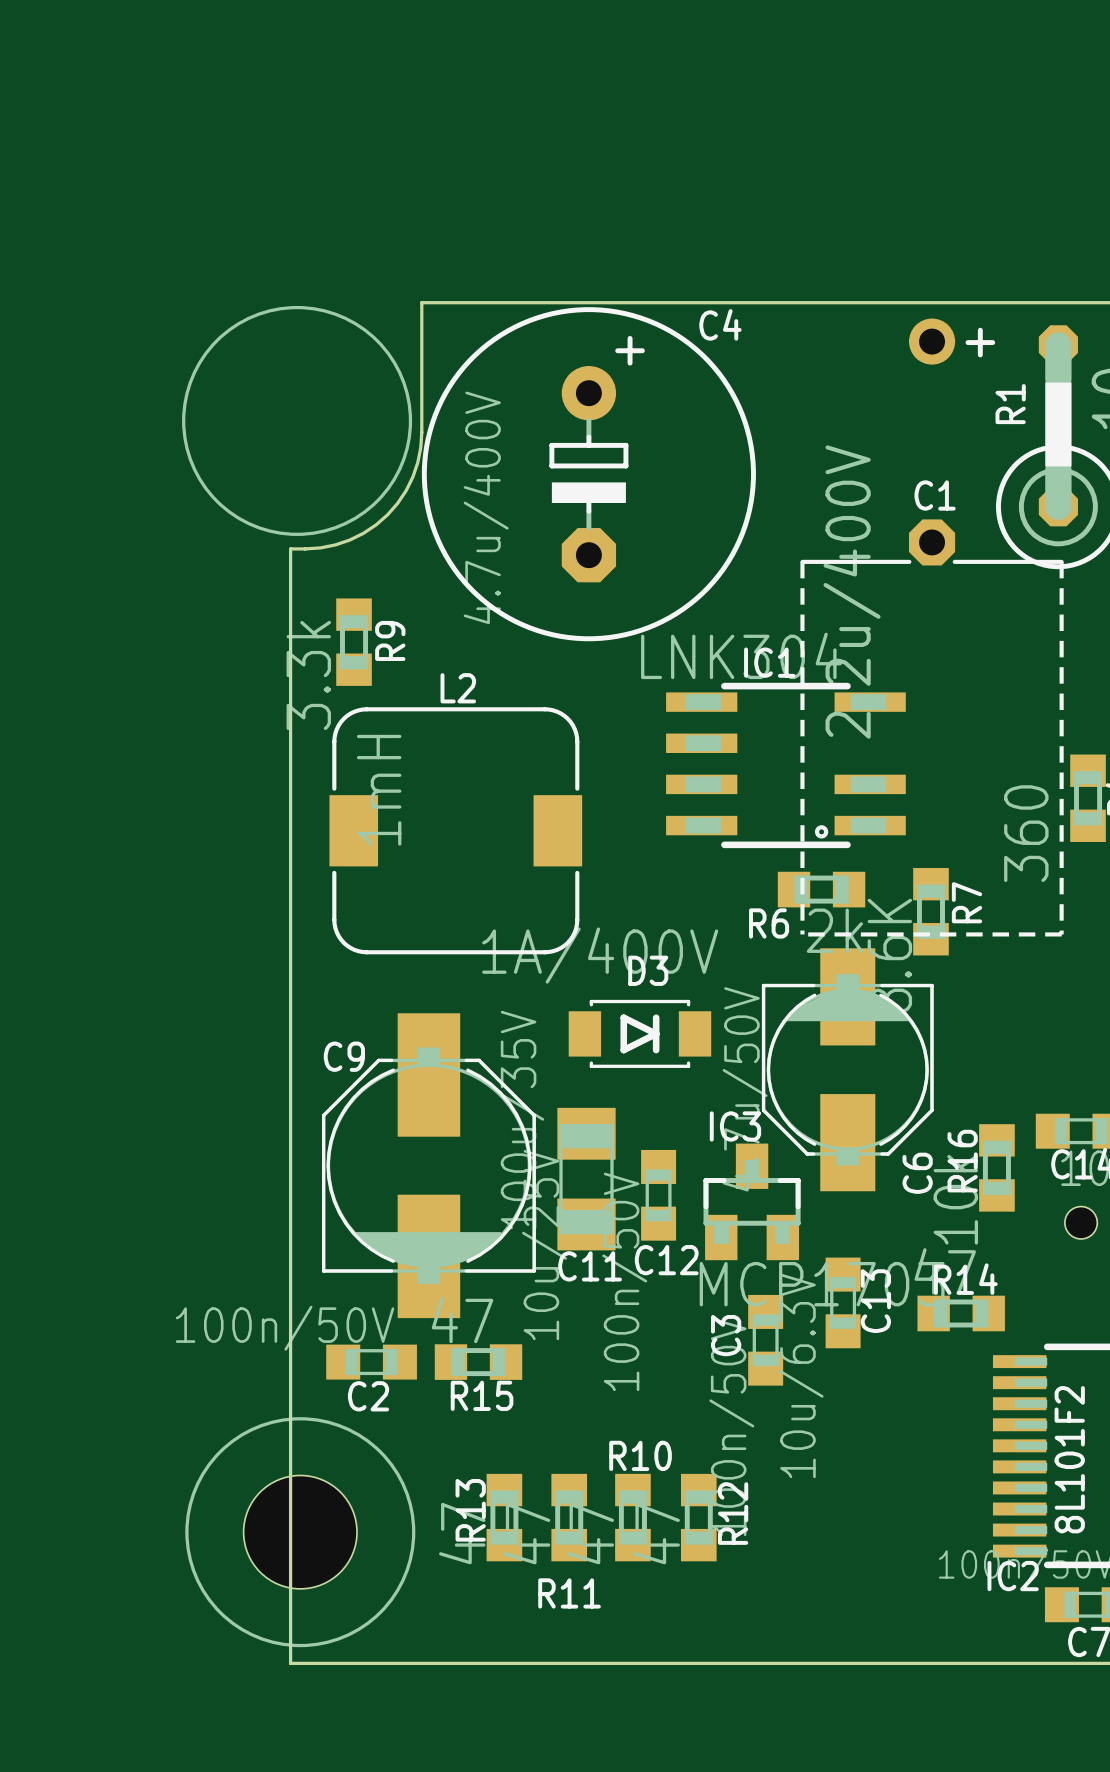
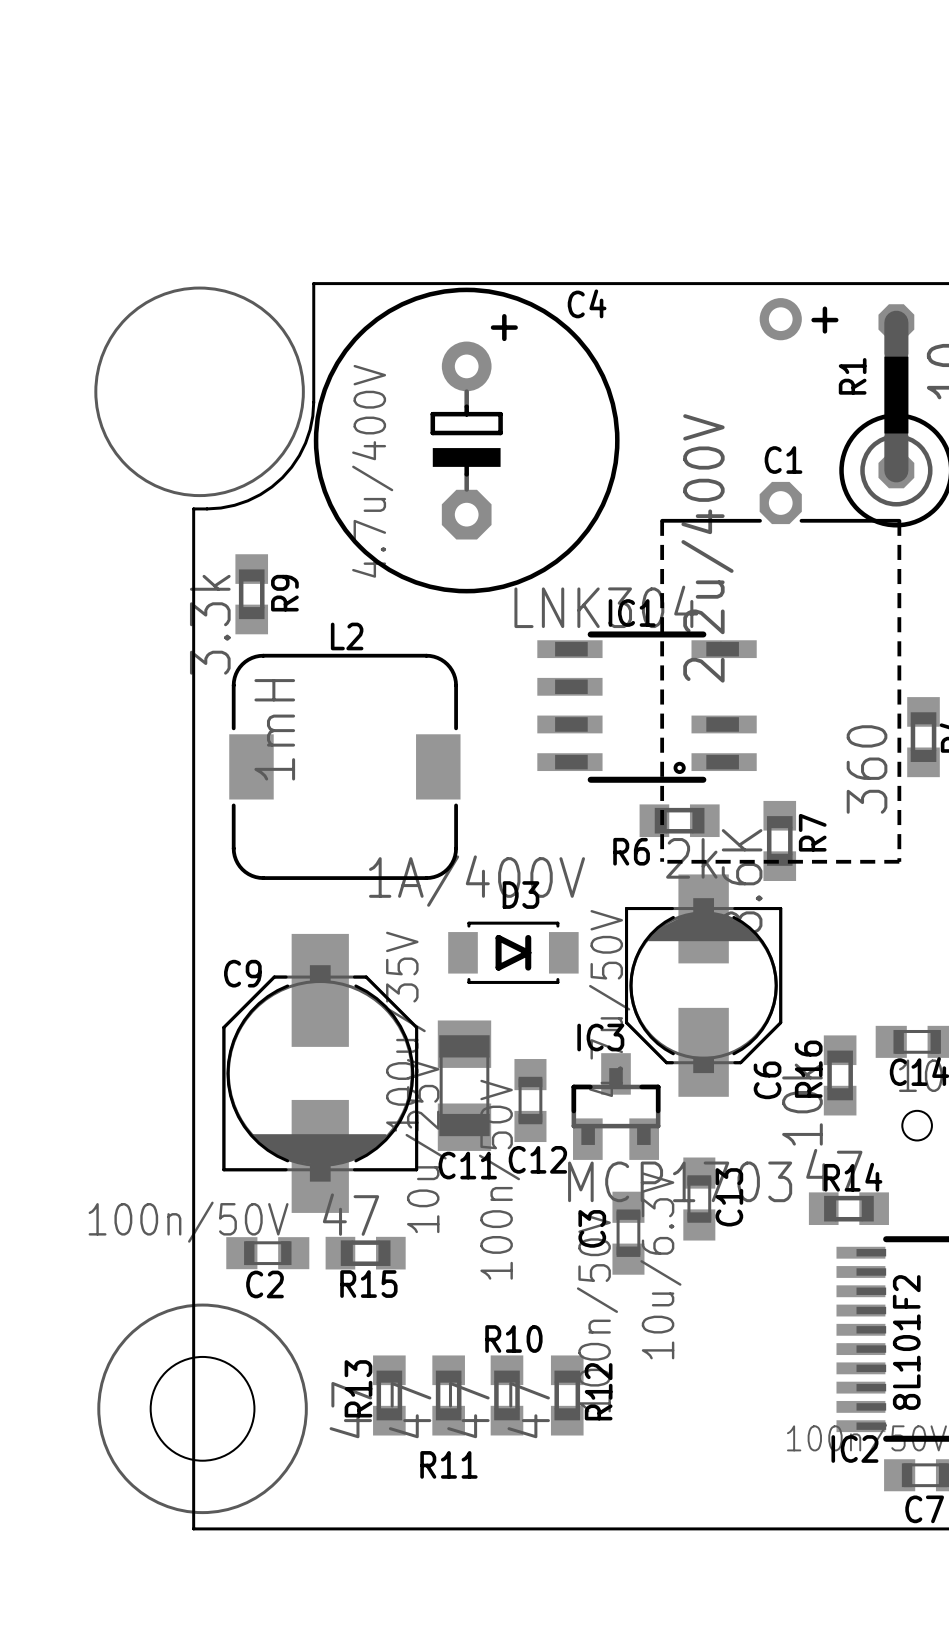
R14 position: (961, 1313) -> (848, 1208)

